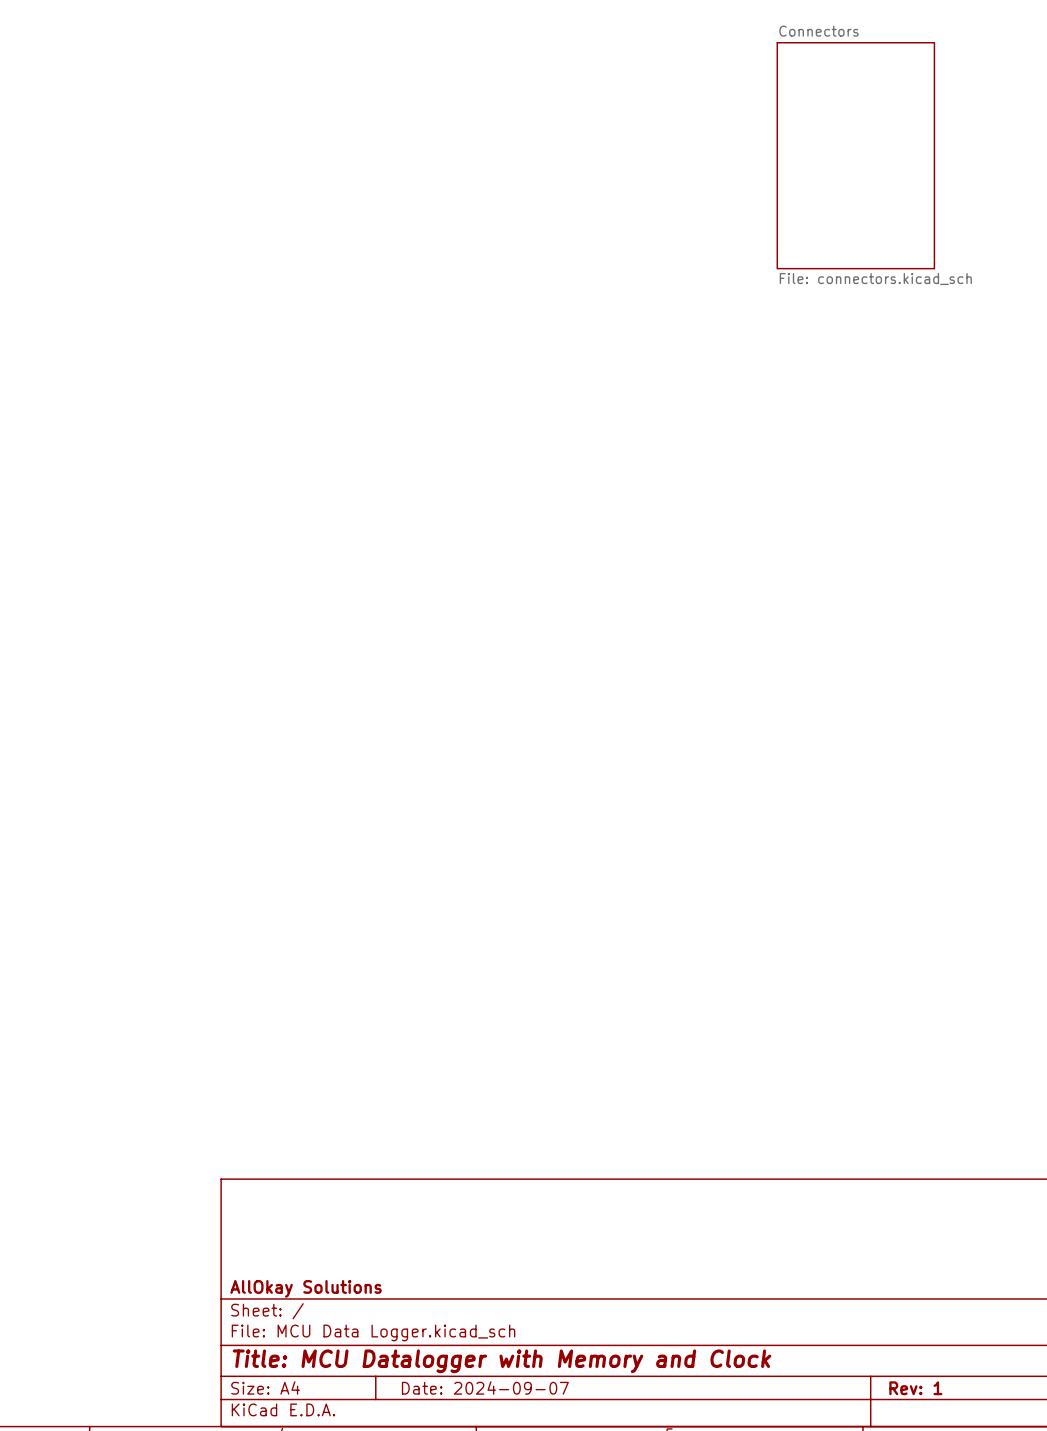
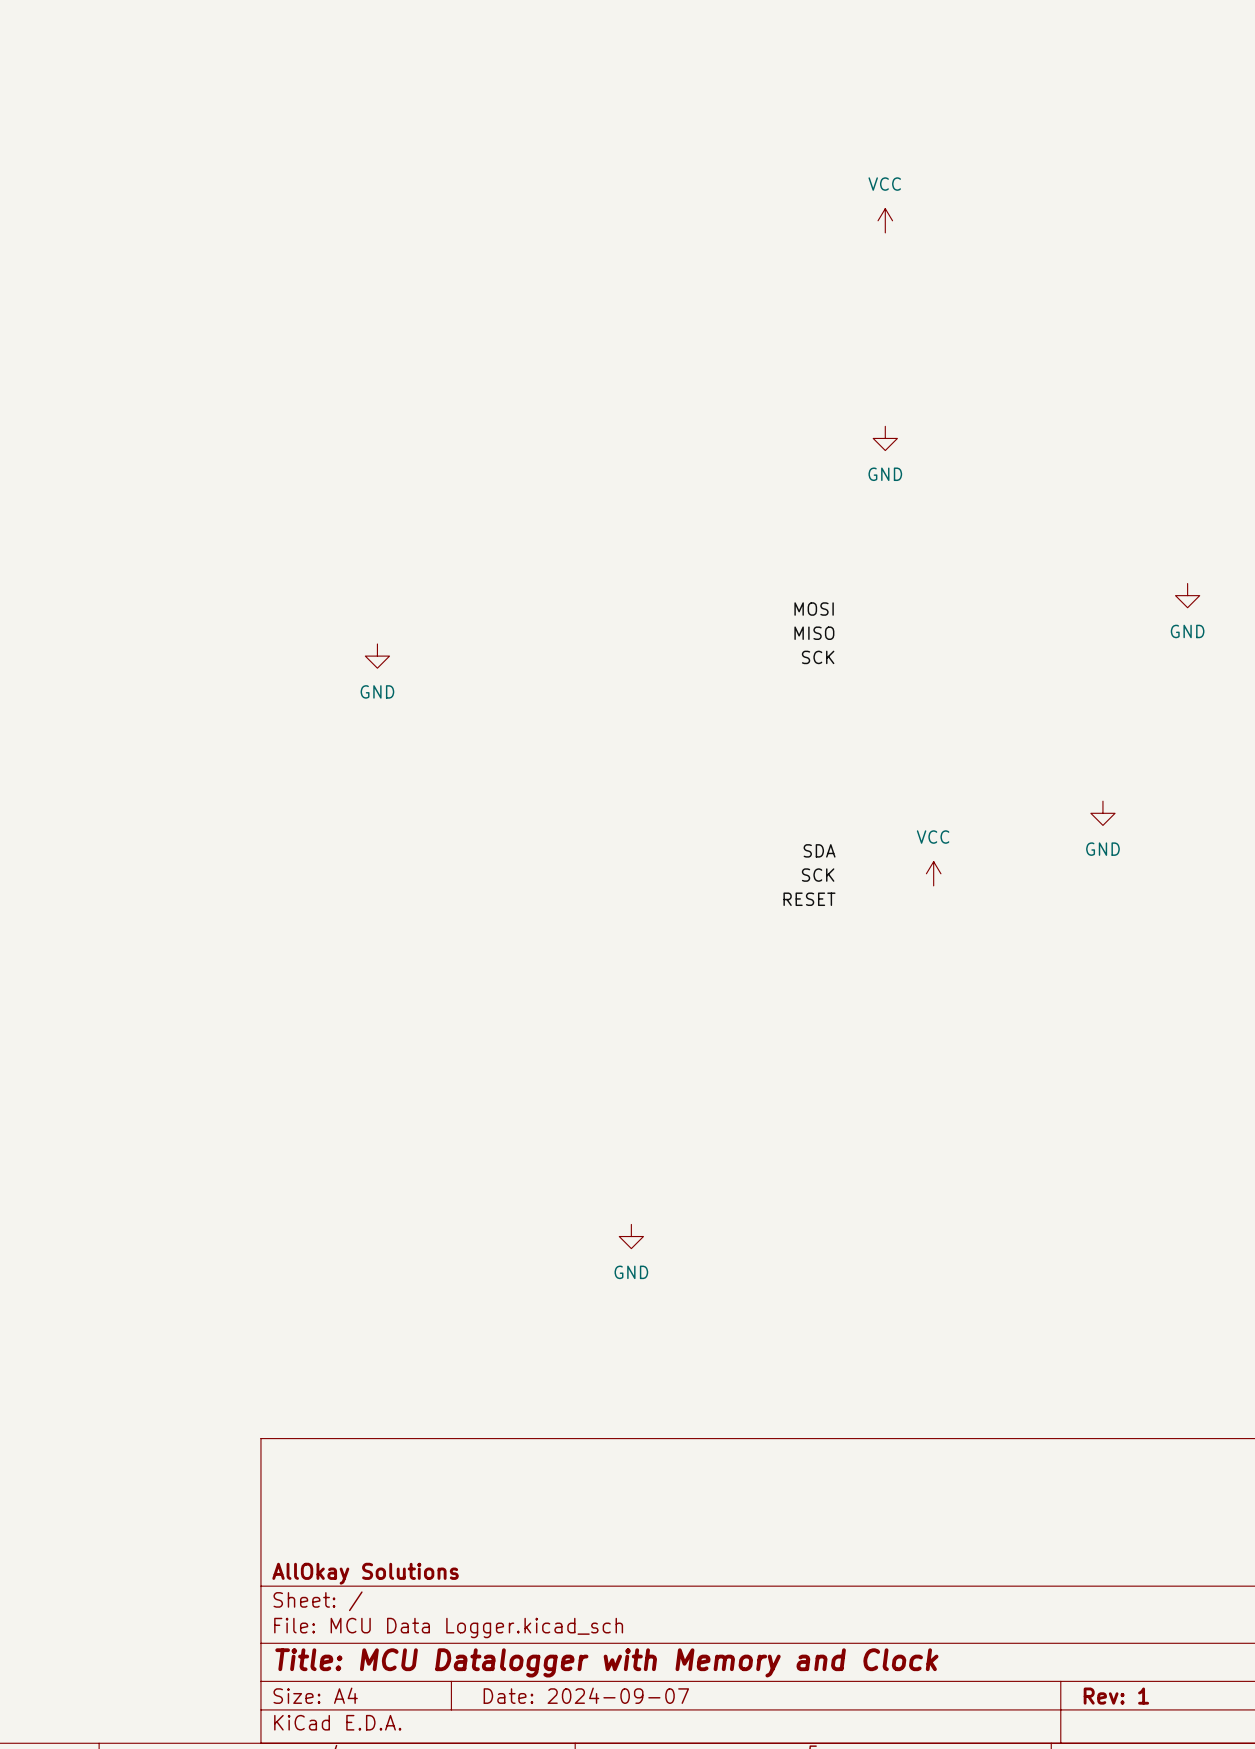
sheet Connectors: File: connectors.kicad_sch (855, 155) -> none
power symbol: none -> VCC (885, 220)
power symbol: none -> GND (885, 438)
power symbol: none -> GND (1187, 595)
label: none -> MOSI (814, 609)
label: none -> MISO (814, 633)
power symbol: none -> GND (377, 656)
label: none -> SCK (818, 657)
power symbol: none -> GND (1102, 813)
label: none -> SDA (819, 850)
power symbol: none -> VCC (933, 873)
label: none -> SCK (818, 875)
label: none -> RESET (809, 899)
power symbol: none -> GND (631, 1236)

